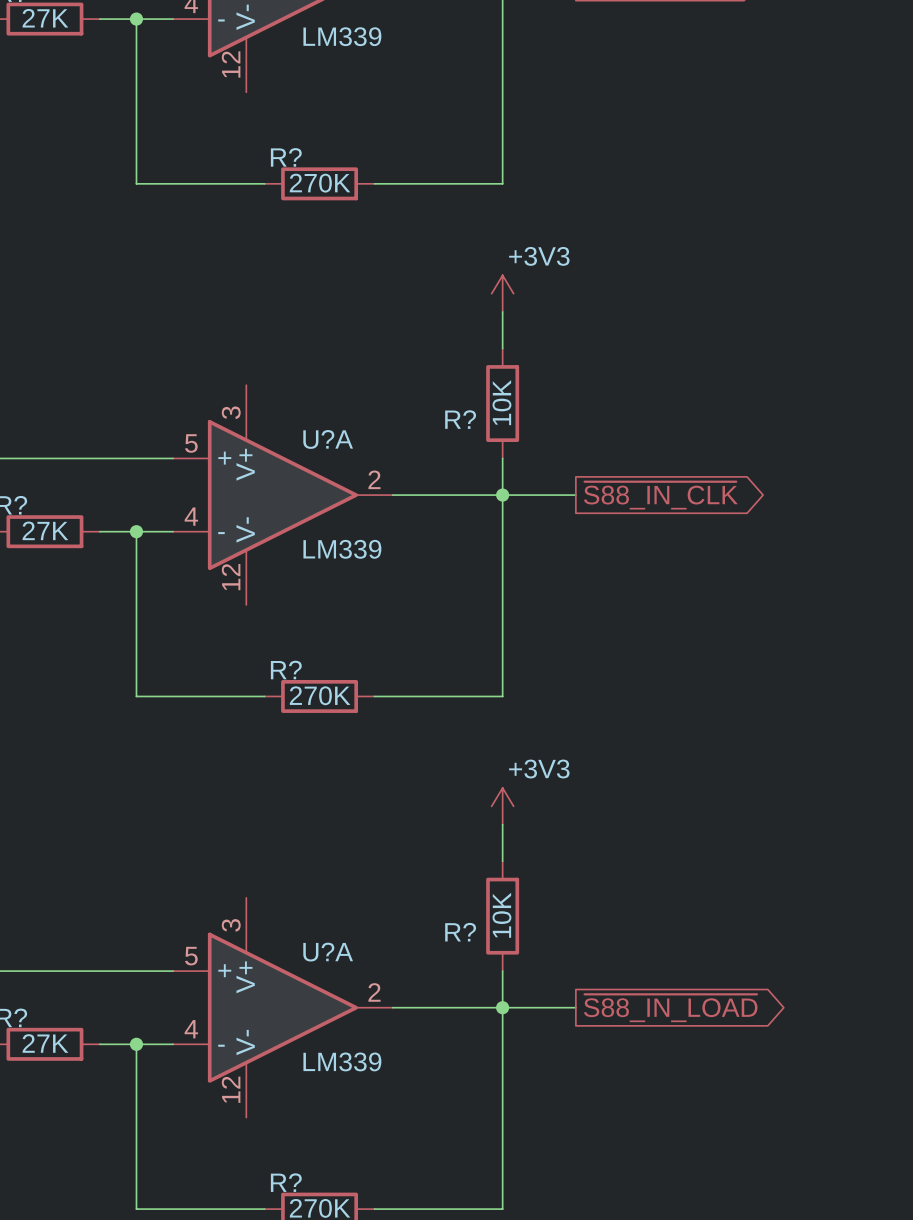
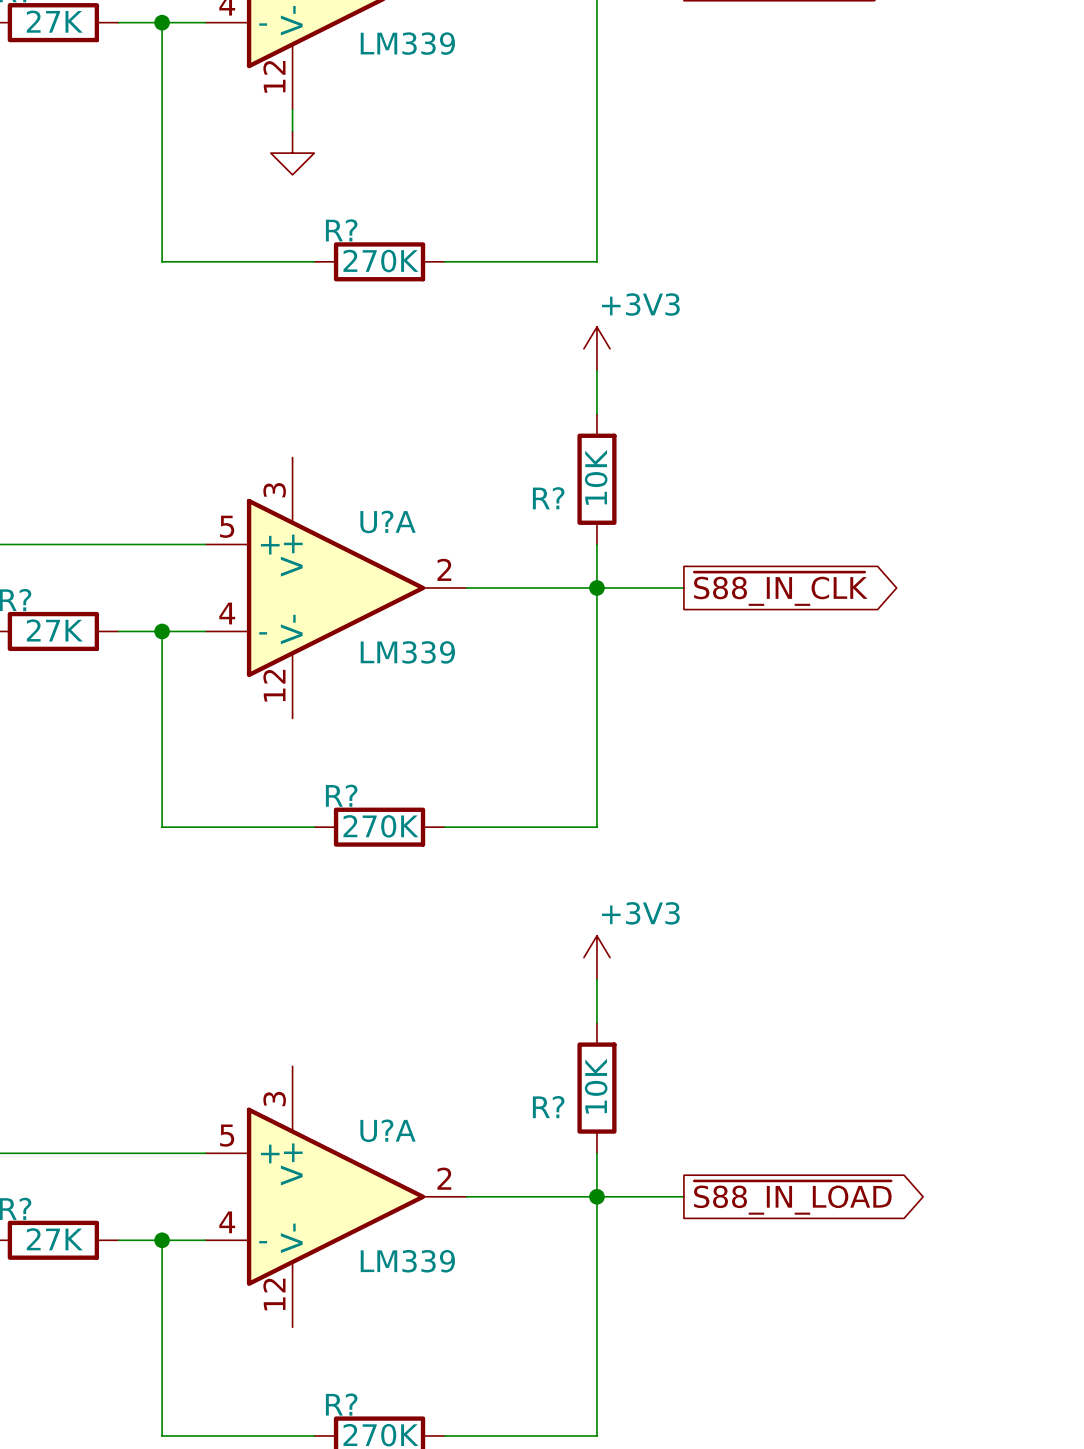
wire: none -> (292, 109) (292, 131)
power symbol: none -> (292, 153)
wire: (136, 183) (264, 183) -> (162, 218) (162, 261) (314, 261)
R? position: (319, 183) -> (379, 261)
wire: (374, 183) (502, 183) -> (444, 261) (596, 261) (596, 218)

